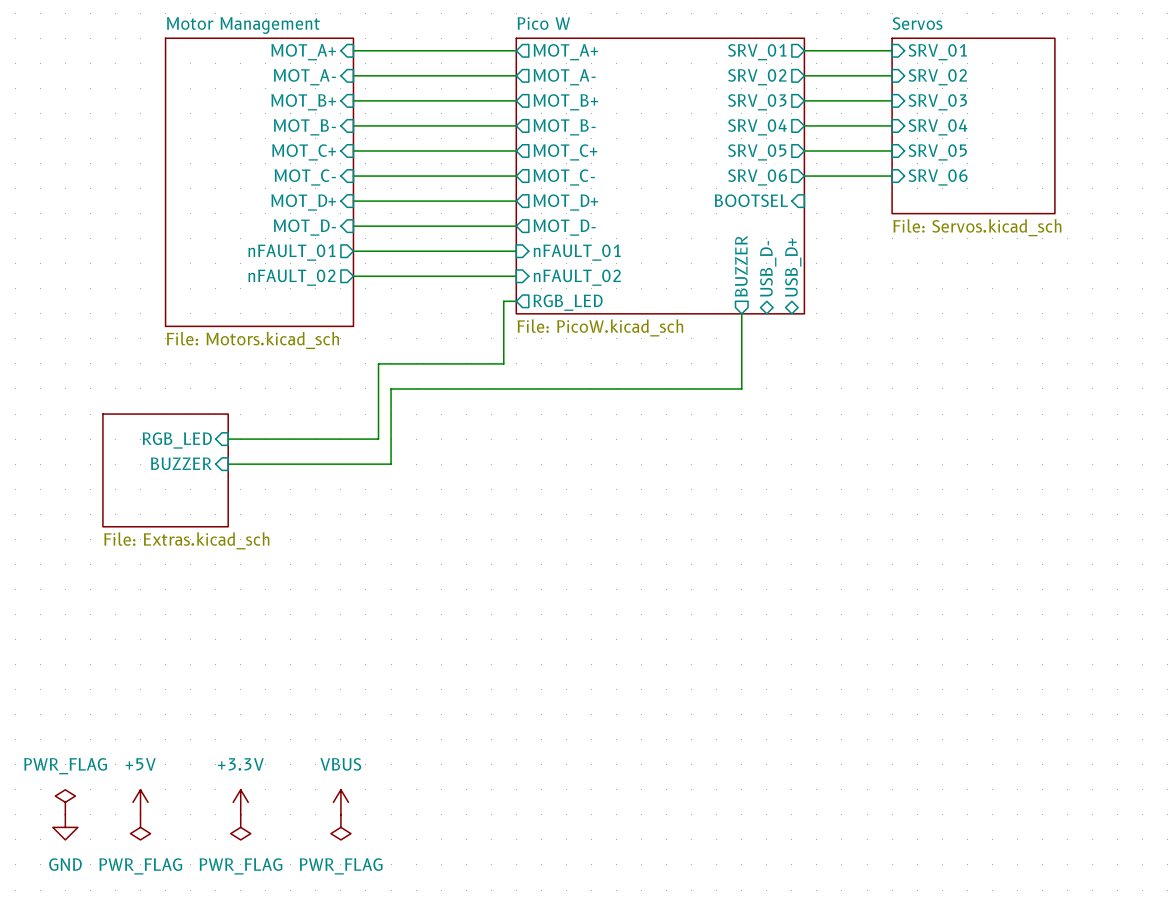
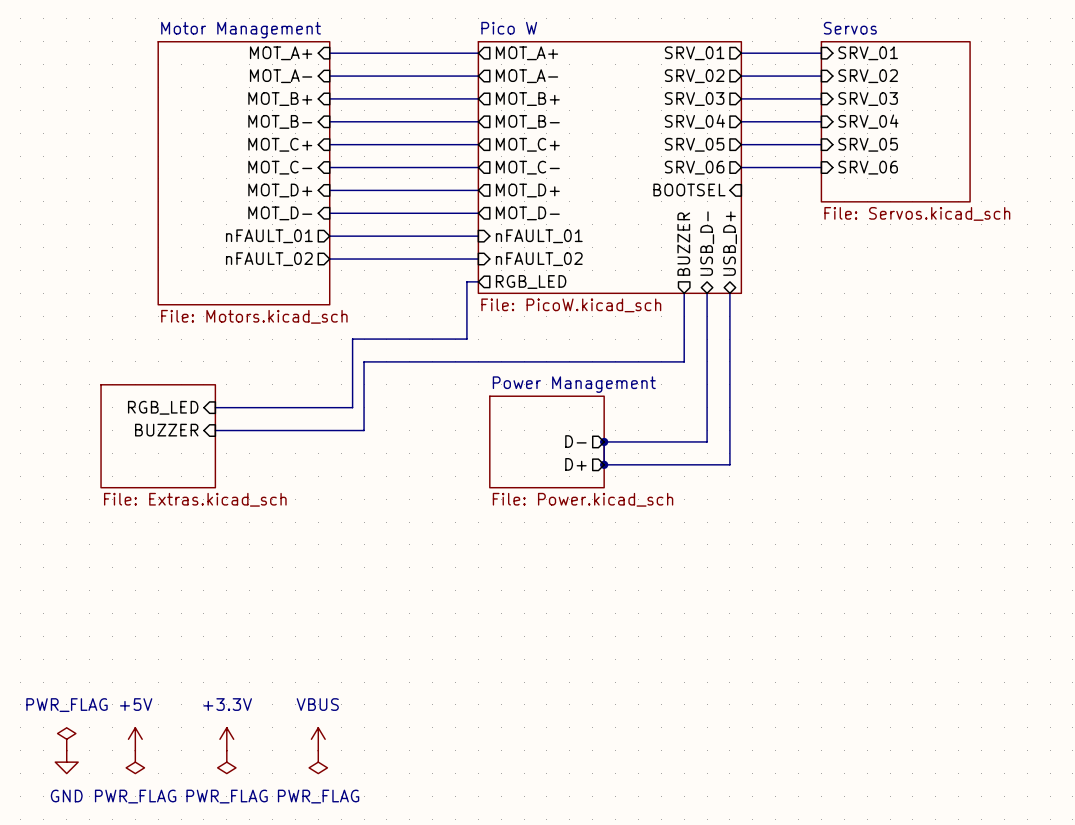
wire: none -> (707, 293) (707, 441) (604, 441) (604, 464) (729, 464) (729, 293)
sheet Power Management: none -> File: Power.kicad_sch (546, 441)
sheet pin: none -> D- (575, 441)
junction: none -> (604, 441)
sheet pin: none -> D+ (575, 464)
junction: none -> (604, 464)

